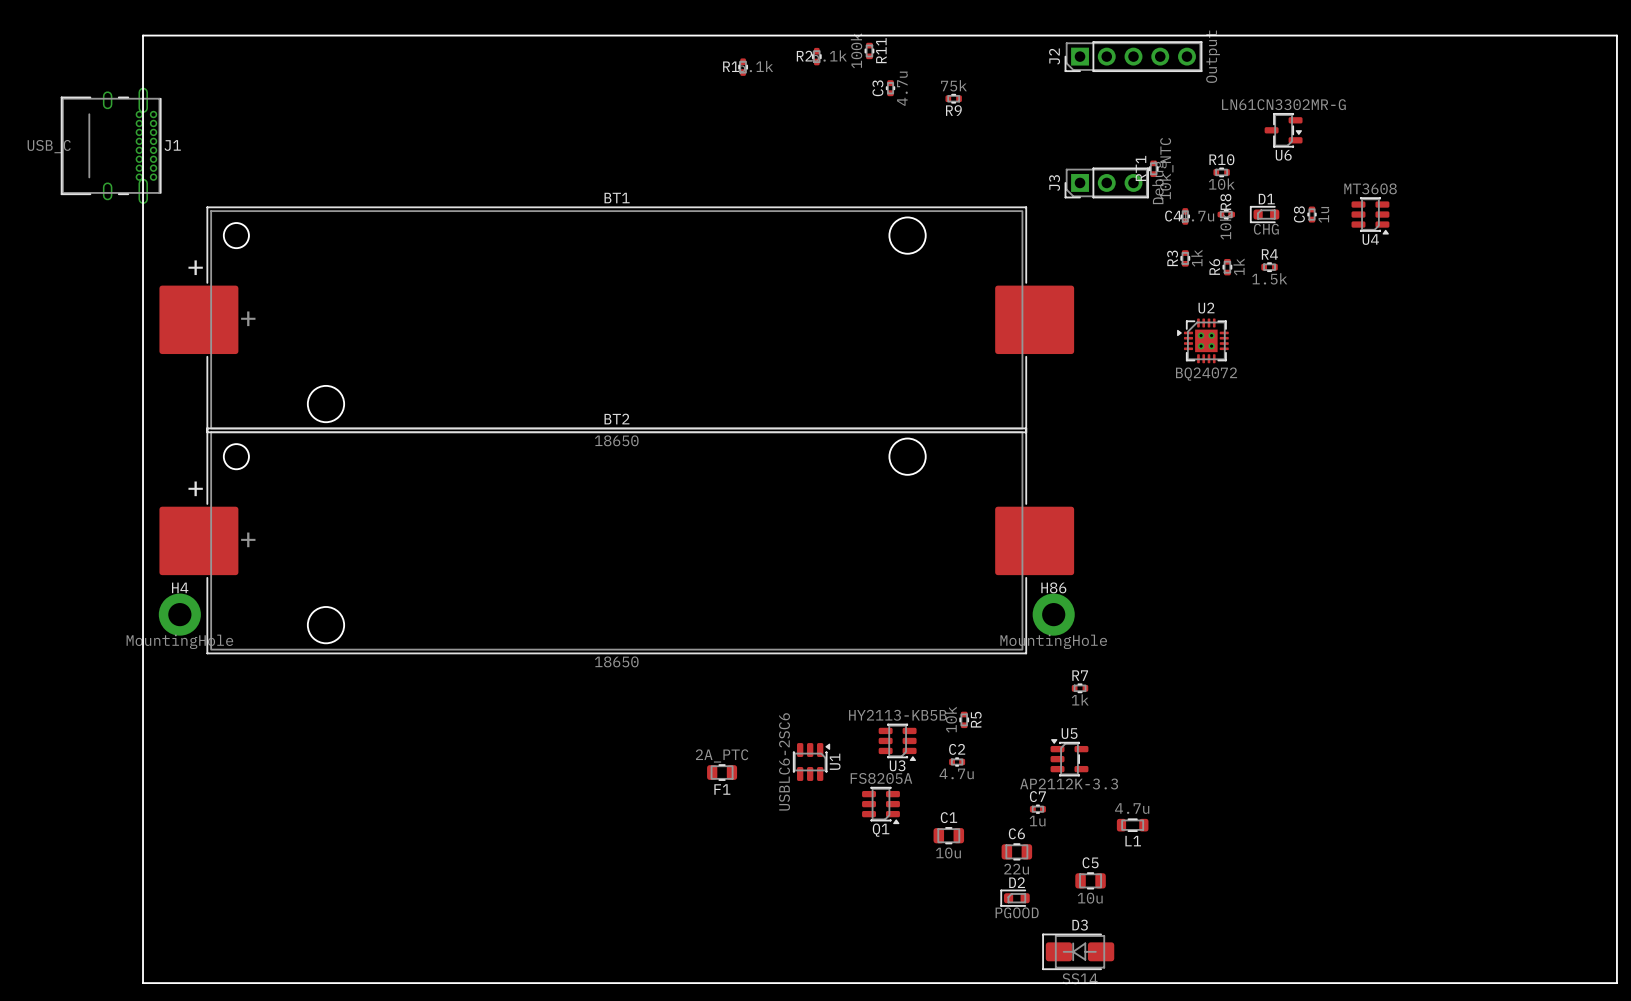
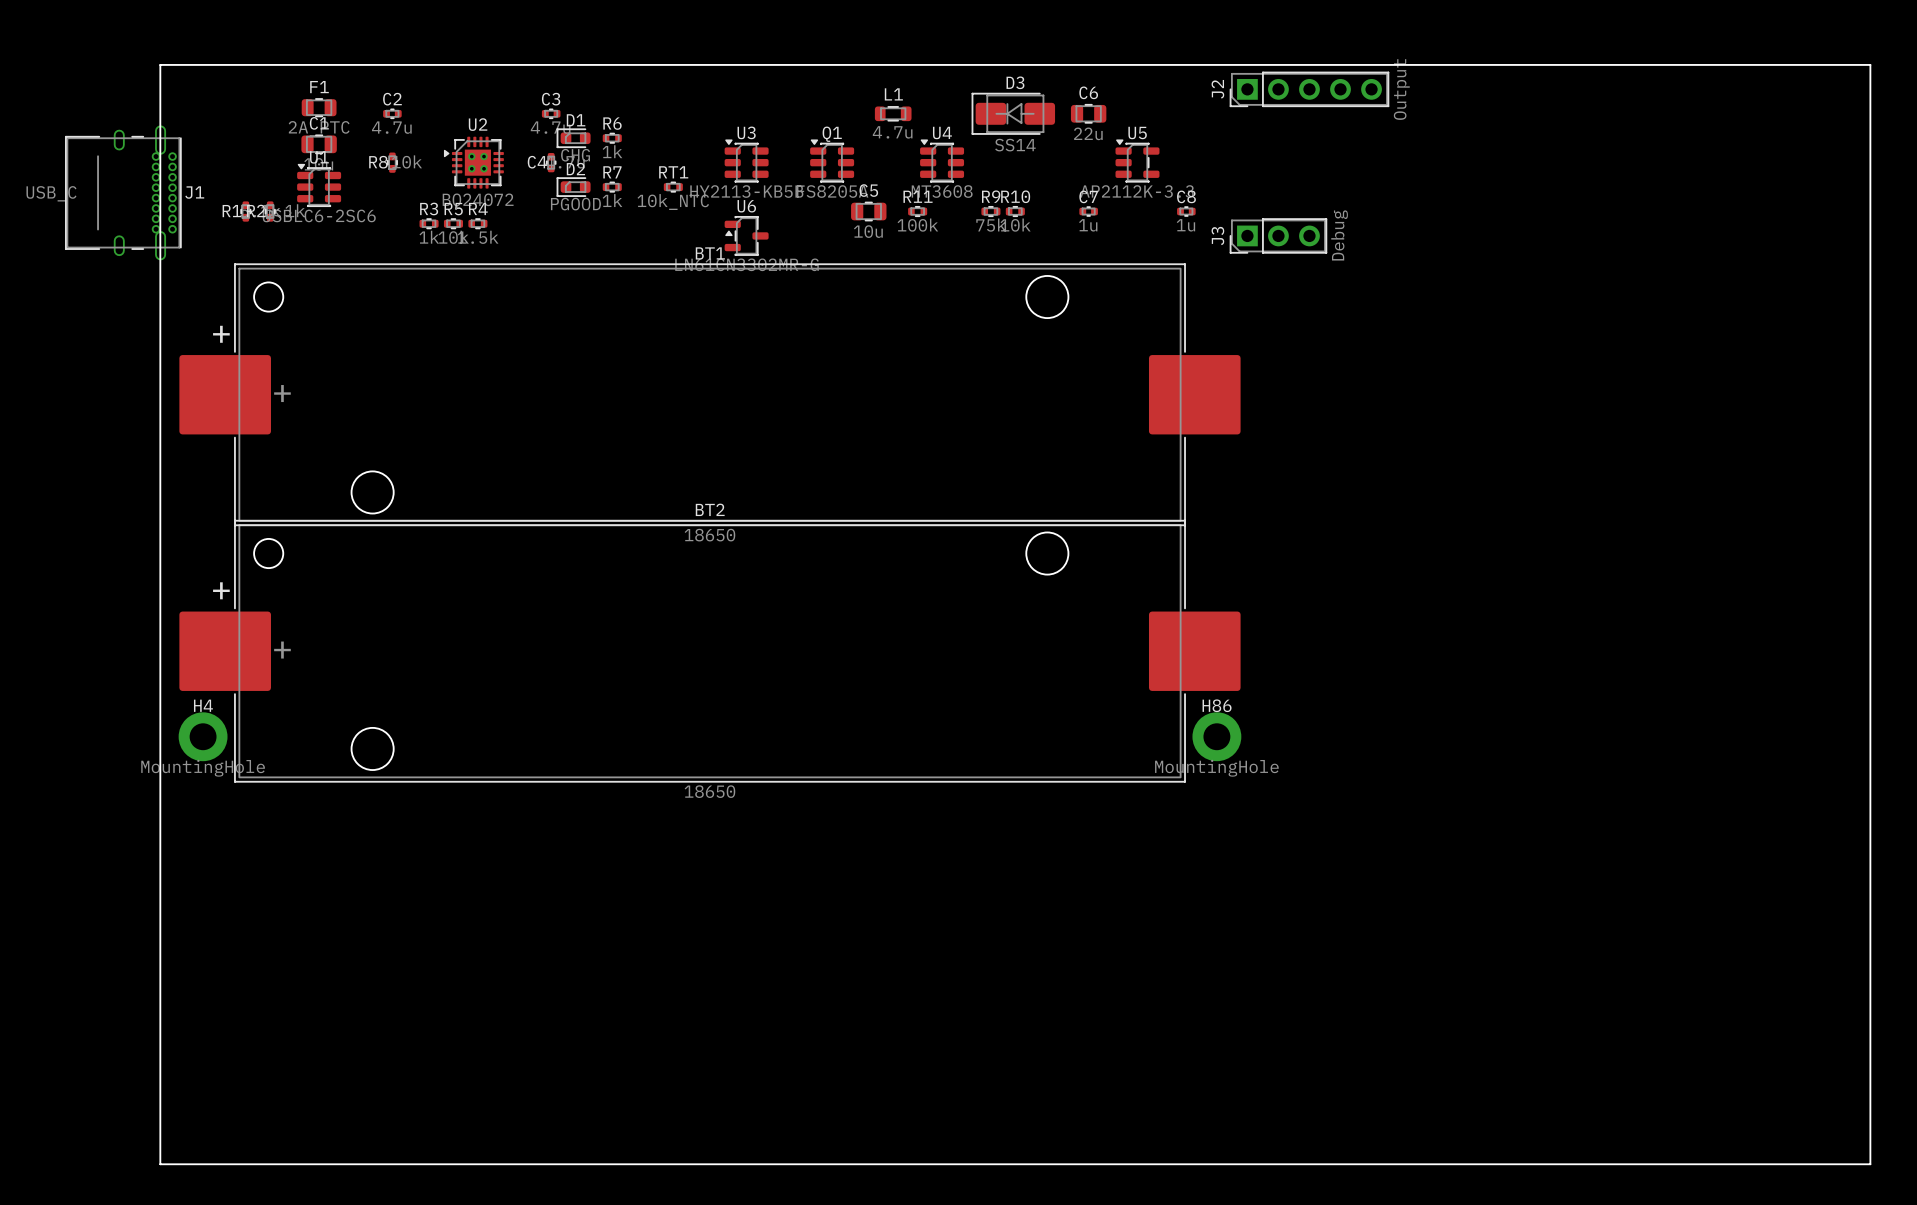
R11 rotation: 0° (869, 50) -> 90° clockwise (917, 211)
R11 position: (869, 50) -> (917, 211)
R2 position: (816, 56) -> (270, 211)
R1 position: (743, 67) -> (245, 211)
R9 value position: 75k (953, 85) -> 75k (991, 225)
C3 rotation: 0° (890, 88) -> 90° clockwise (551, 113)
C3 position: (890, 88) -> (551, 113)
R9 position: (953, 98) -> (990, 211)
R9 name position: R9 (953, 110) -> R9 (991, 196)
U6 rotation: 0° (1283, 130) -> 180° (746, 235)
U6 position: (1283, 130) -> (746, 235)
RT1 rotation: 0° (1153, 168) -> 90° clockwise (673, 187)
RT1 position: (1153, 168) -> (673, 187)
R10 position: (1221, 172) -> (1015, 211)
R8 rotation: 0° (1226, 214) -> 90° clockwise (392, 162)
R8 position: (1226, 214) -> (392, 162)
D1 position: (1264, 214) -> (573, 138)
C8 rotation: 0° (1312, 214) -> 90° clockwise (1186, 211)
C8 position: (1312, 214) -> (1186, 211)
C4 position: (1185, 216) -> (551, 162)
U4 rotation: 0° (1370, 216) -> 180° (942, 160)
U4 position: (1370, 216) -> (942, 160)
R3 rotation: 0° (1185, 258) -> 90° clockwise (429, 223)
R3 position: (1185, 258) -> (429, 223)
R6 rotation: 0° (1227, 267) -> 90° clockwise (612, 138)
R6 position: (1227, 267) -> (612, 138)
R4 position: (1269, 267) -> (477, 223)
U2 position: (1202, 340) -> (473, 162)
R7 position: (1080, 688) -> (612, 187)
R5 rotation: 0° (964, 719) -> 90° clockwise (453, 223)
R5 position: (964, 719) -> (453, 223)
U3 rotation: 0° (897, 742) -> 180° (746, 160)
U3 position: (897, 742) -> (746, 160)
F1 value position: 2A_PTC (722, 755) -> 2A_PTC (319, 128)
U5 position: (1069, 757) -> (1137, 160)
U1 rotation: 0° (811, 762) -> 90° counterclockwise (319, 185)
U1 position: (811, 762) -> (319, 185)
C2 position: (957, 762) -> (392, 113)
F1 position: (722, 772) -> (319, 107)
F1 name position: F1 (722, 789) -> F1 (319, 87)
Q1 rotation: 0° (880, 805) -> 180° (832, 160)
Q1 position: (880, 805) -> (832, 160)
L1 value position: 4.7u (1132, 808) -> 4.7u (892, 132)
C7 position: (1037, 809) -> (1088, 211)
L1 position: (1132, 825) -> (893, 113)
C1 position: (948, 835) -> (319, 144)
L1 name position: L1 (1133, 841) -> L1 (893, 94)
C6 position: (1016, 851) -> (1088, 113)
C5 position: (1090, 880) -> (868, 211)
D2 position: (1015, 898) -> (573, 187)
D3 position: (1078, 951) -> (1013, 113)

